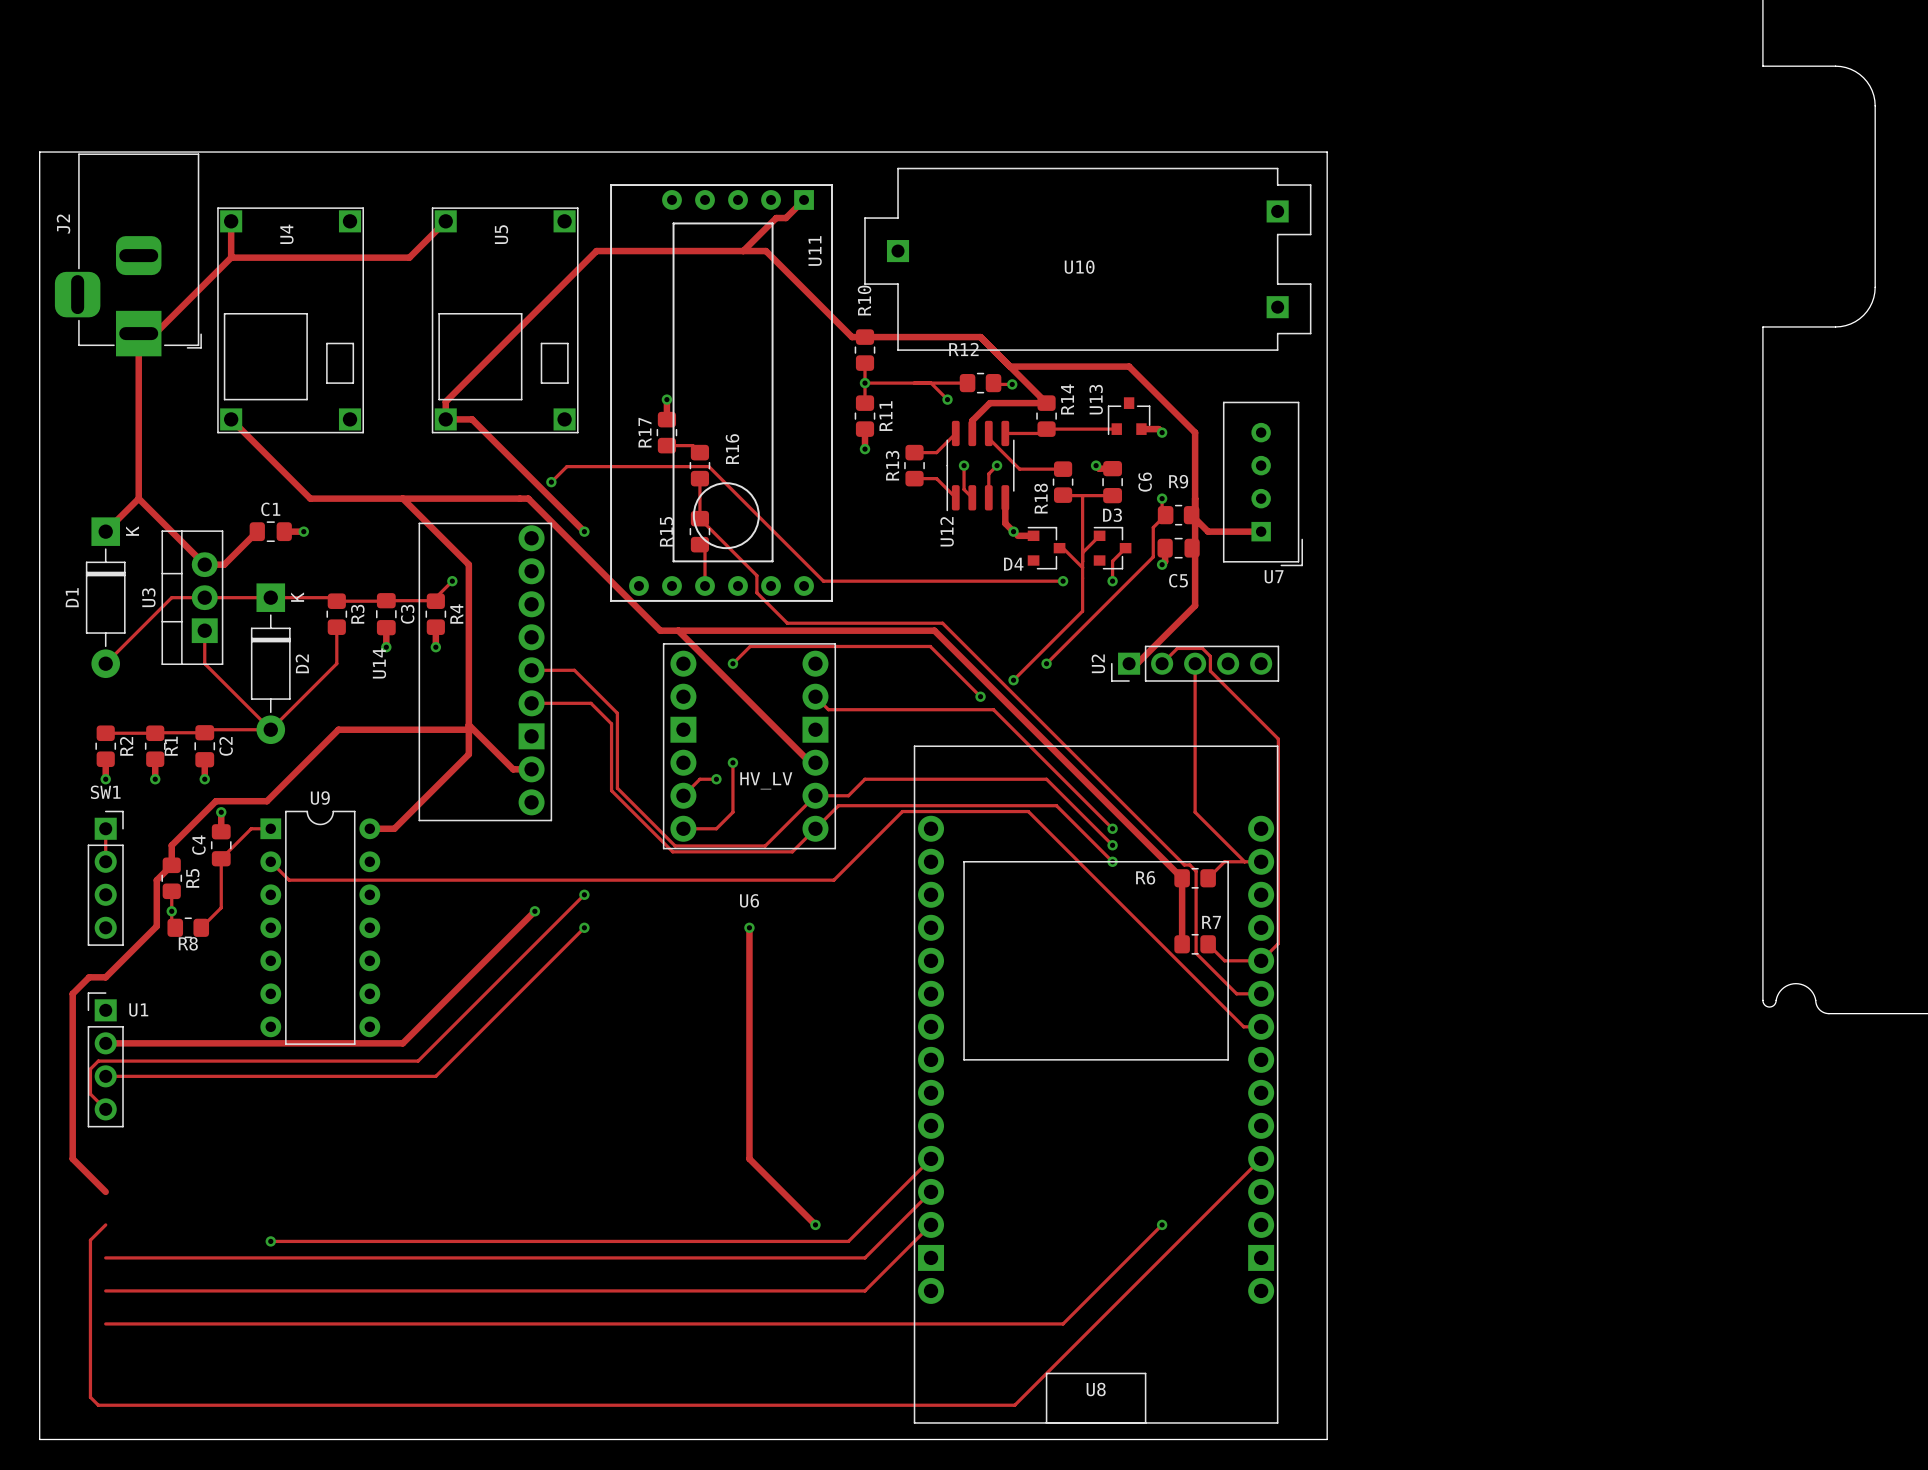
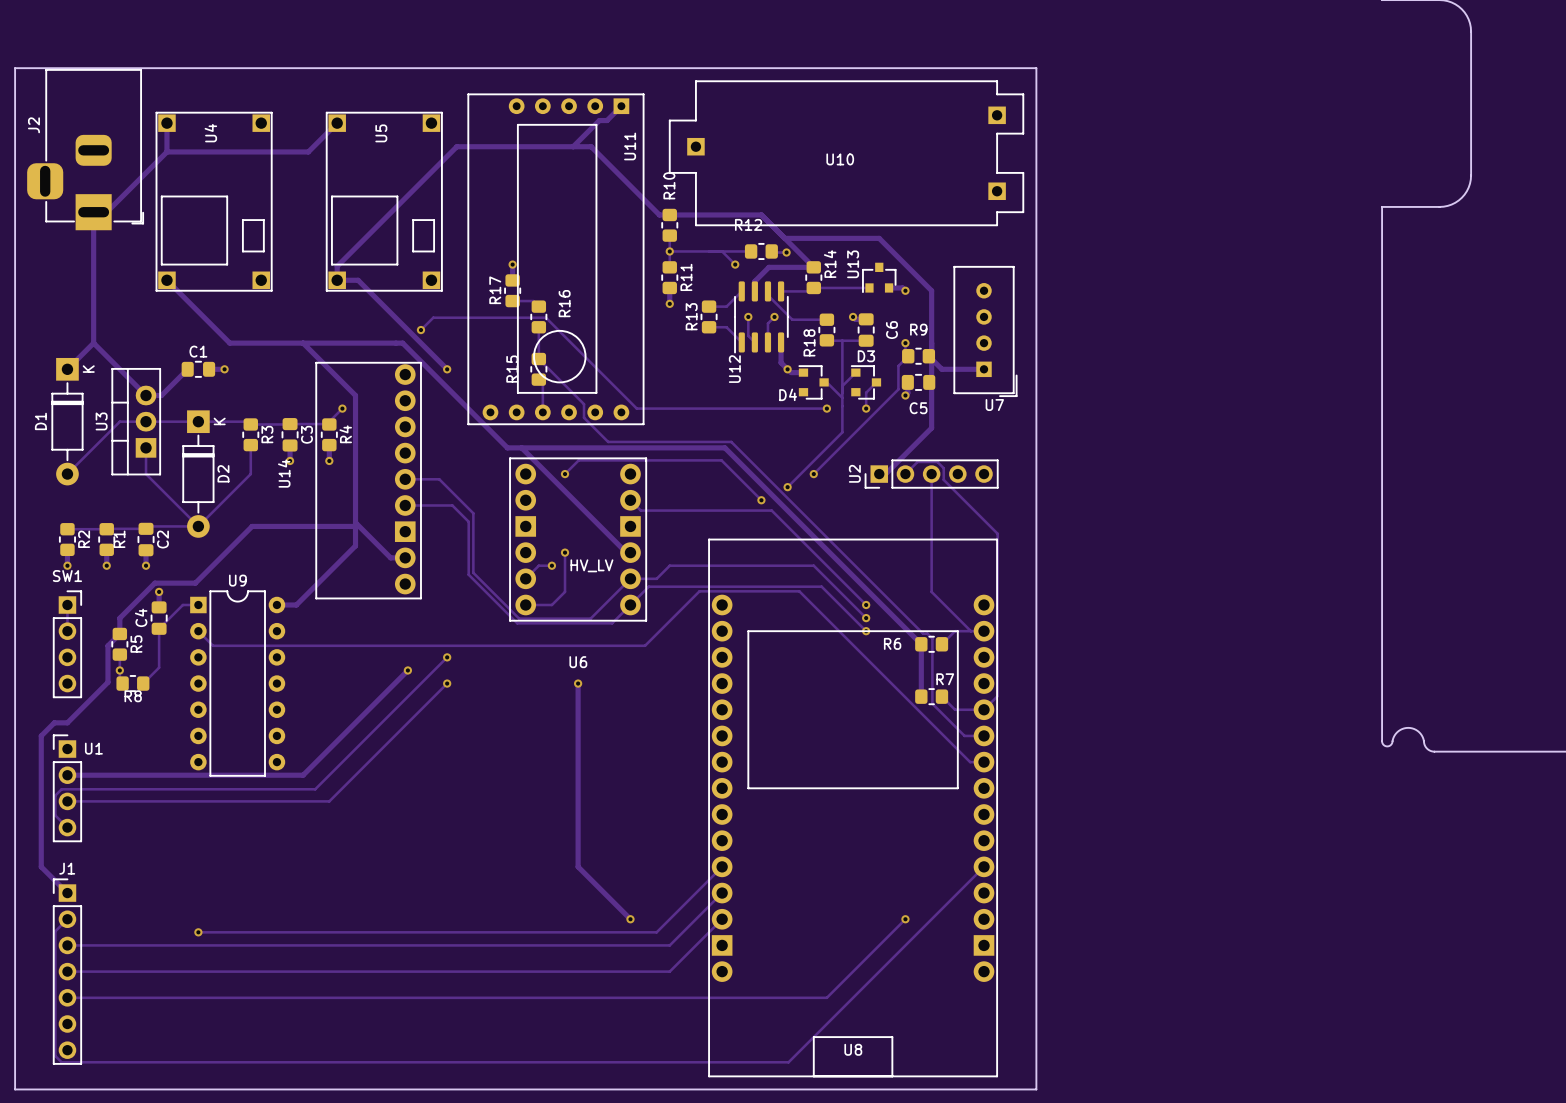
J1: none -> (67, 971)

